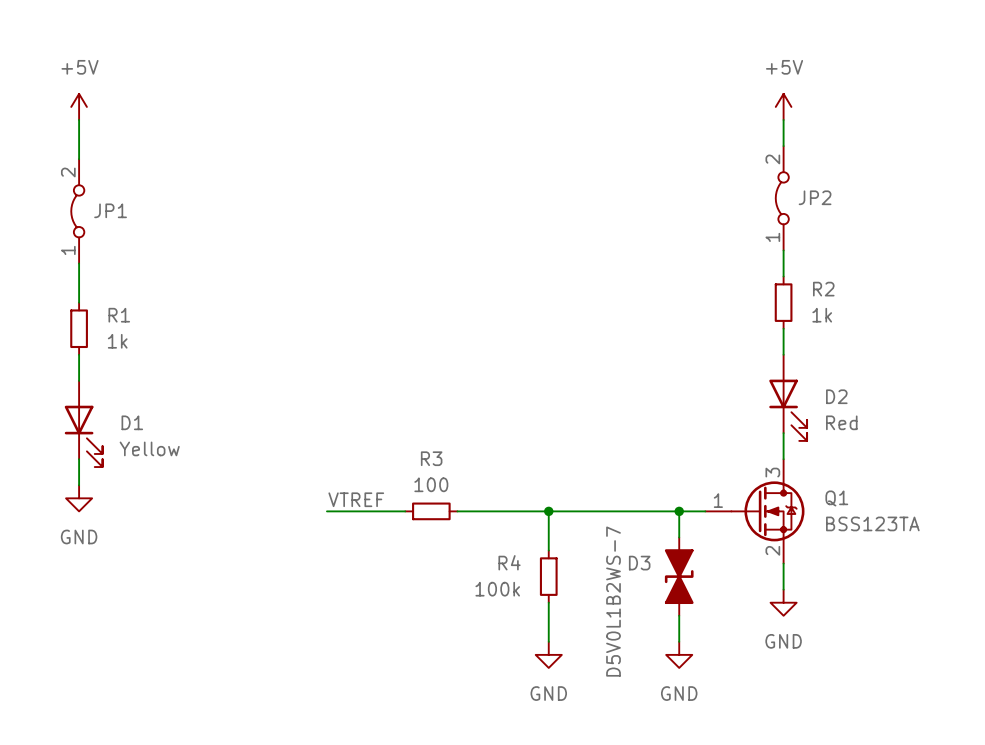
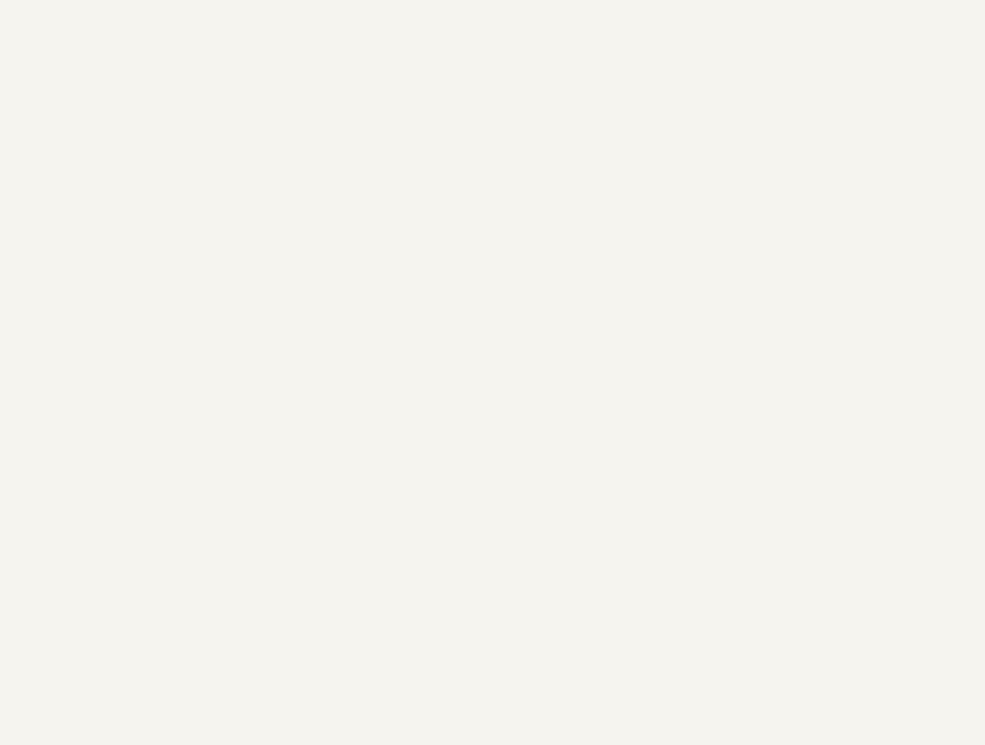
power symbol: +5V (79, 106) -> none
power symbol: +5V (783, 106) -> none
wire: (79, 119) (79, 159) -> none
wire: (783, 119) (783, 146) -> none
JP2: (782, 198) -> none
JP1: (77, 211) -> none
wire: (783, 250) (783, 276) -> none
wire: (79, 263) (79, 302) -> none
R2: 1k (783, 302) -> none
R1: 1k (79, 328) -> none
wire: (783, 328) (783, 354) -> none
wire: (79, 354) (79, 380) -> none
D2: Red (788, 397) -> none
D1: Yellow (83, 423) -> none
wire: (783, 433) (783, 459) -> none
wire: (79, 459) (79, 485) -> none
power symbol: GND (79, 498) -> none
label: VTREF (356, 499) -> none
wire: (326, 511) (405, 511) -> none
R3: 100 (431, 511) -> none
wire: (457, 511) (705, 511) -> none
wire: (548, 511) (548, 550) -> none
junction: (548, 511) -> none
wire: (679, 511) (679, 537) -> none
junction: (679, 511) -> none
Q1: BSS123TA (754, 511) -> none
wire: (783, 563) (783, 589) -> none
R4: 100k (548, 576) -> none
D3: D5V0L1B2WS-7 (679, 576) -> none
wire: (548, 602) (548, 641) -> none
power symbol: GND (783, 602) -> none
wire: (679, 615) (679, 641) -> none
power symbol: GND (548, 654) -> none
power symbol: GND (679, 654) -> none

